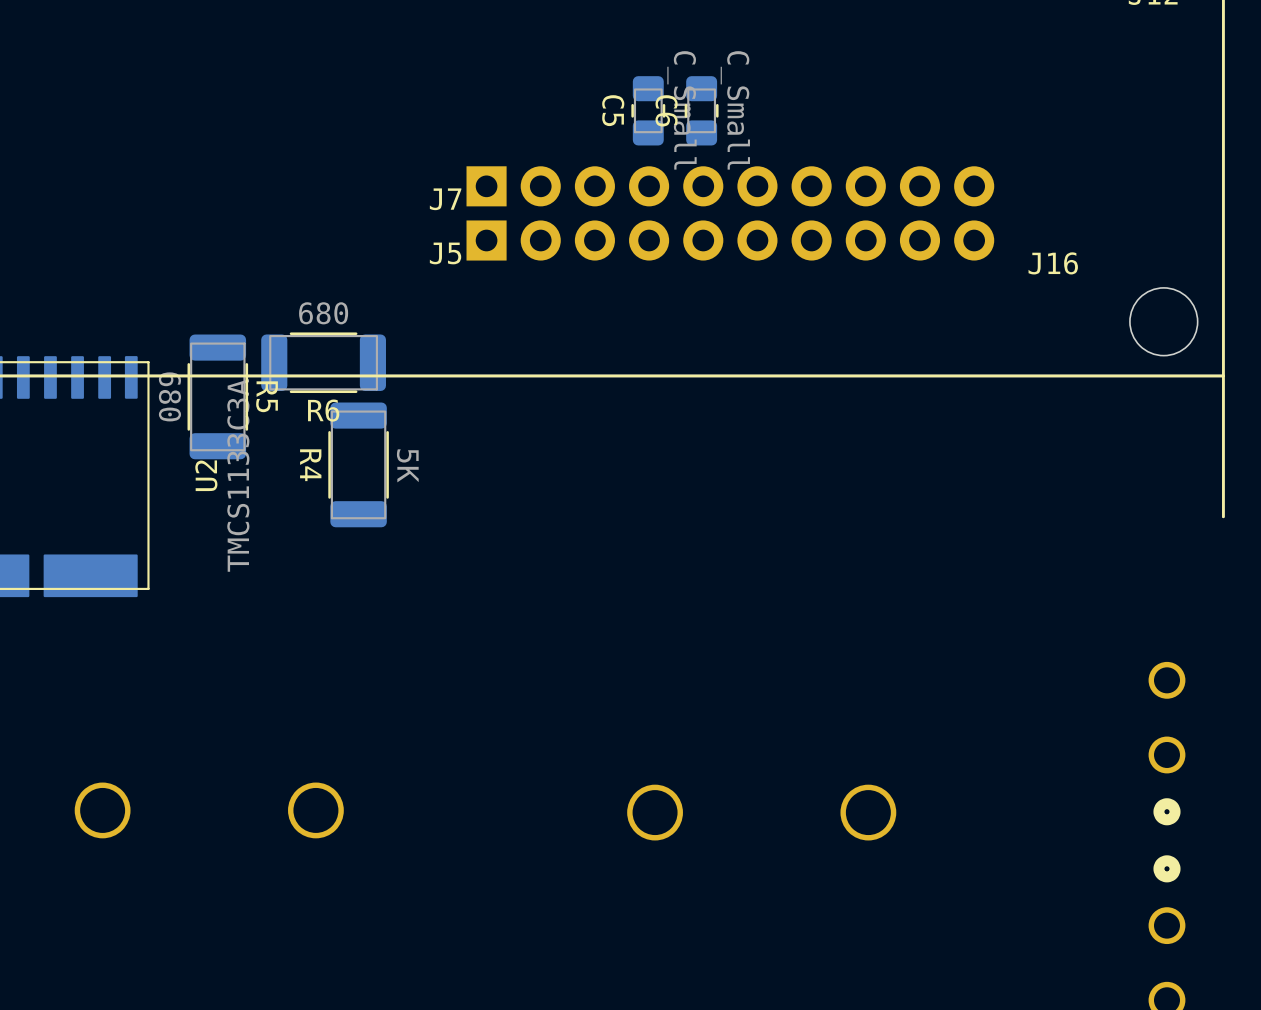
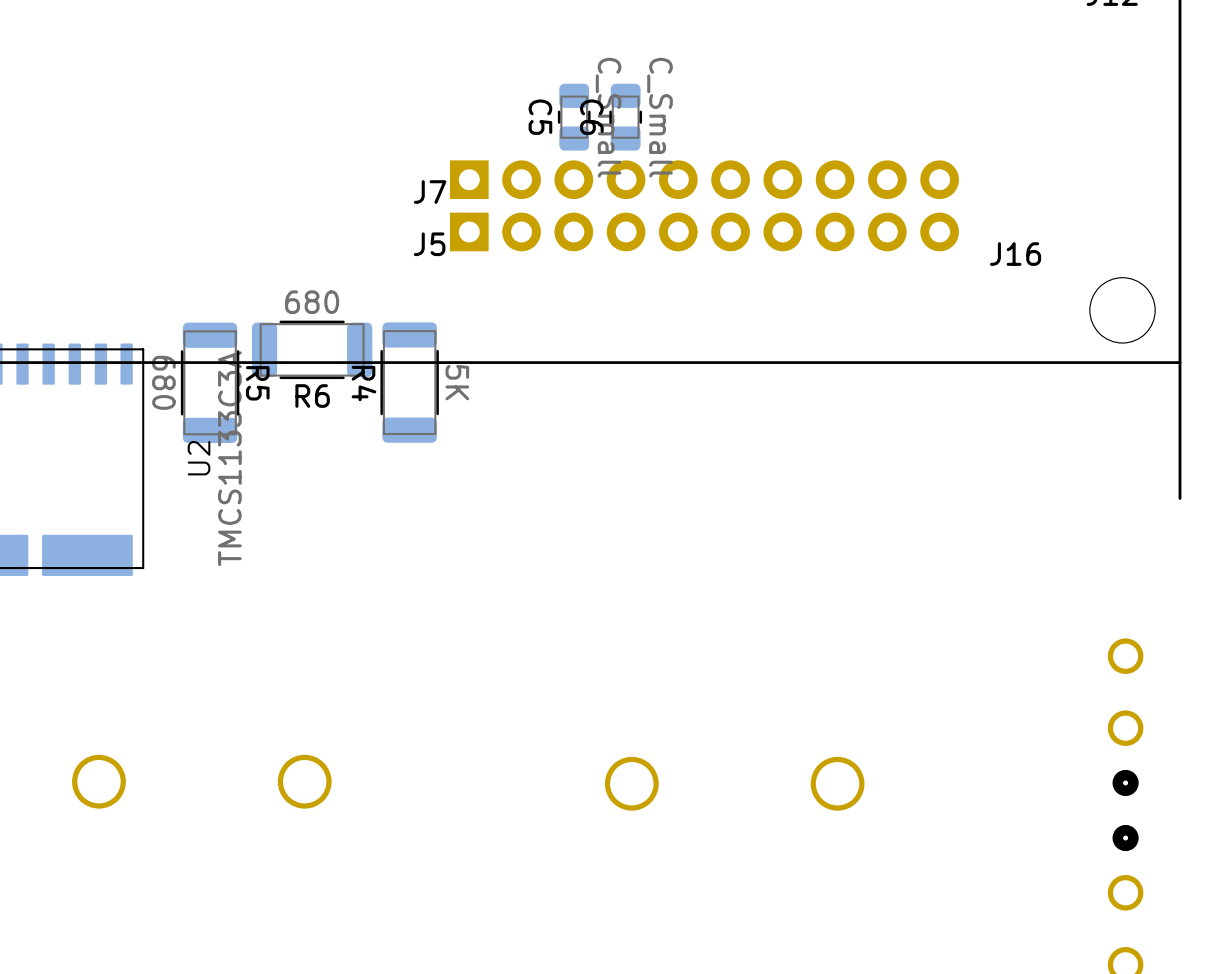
C5 position: (648, 110) -> (574, 117)
C6 position: (701, 110) -> (625, 117)
R4 position: (358, 464) -> (409, 382)

